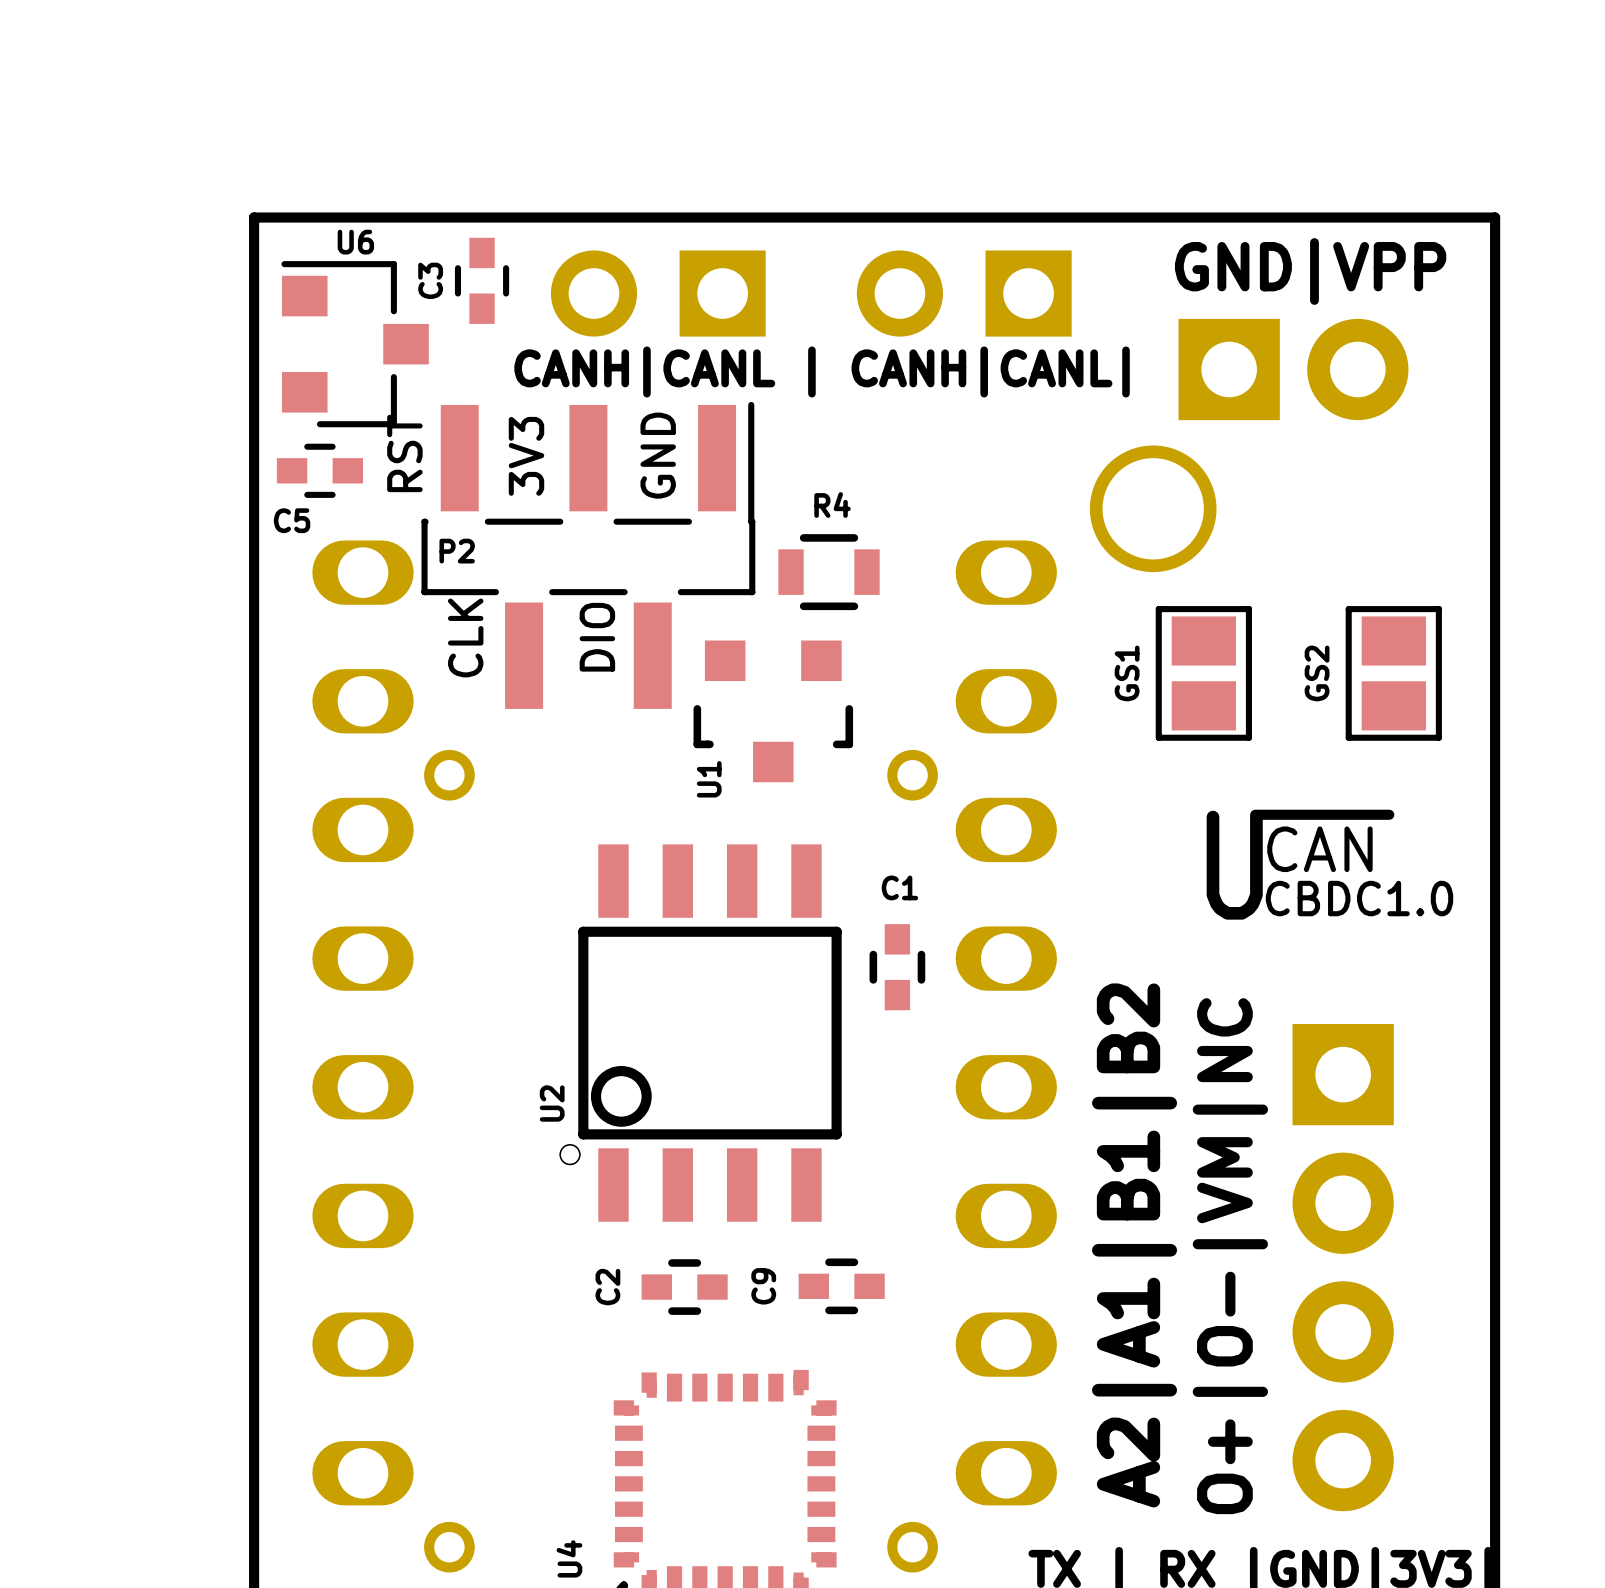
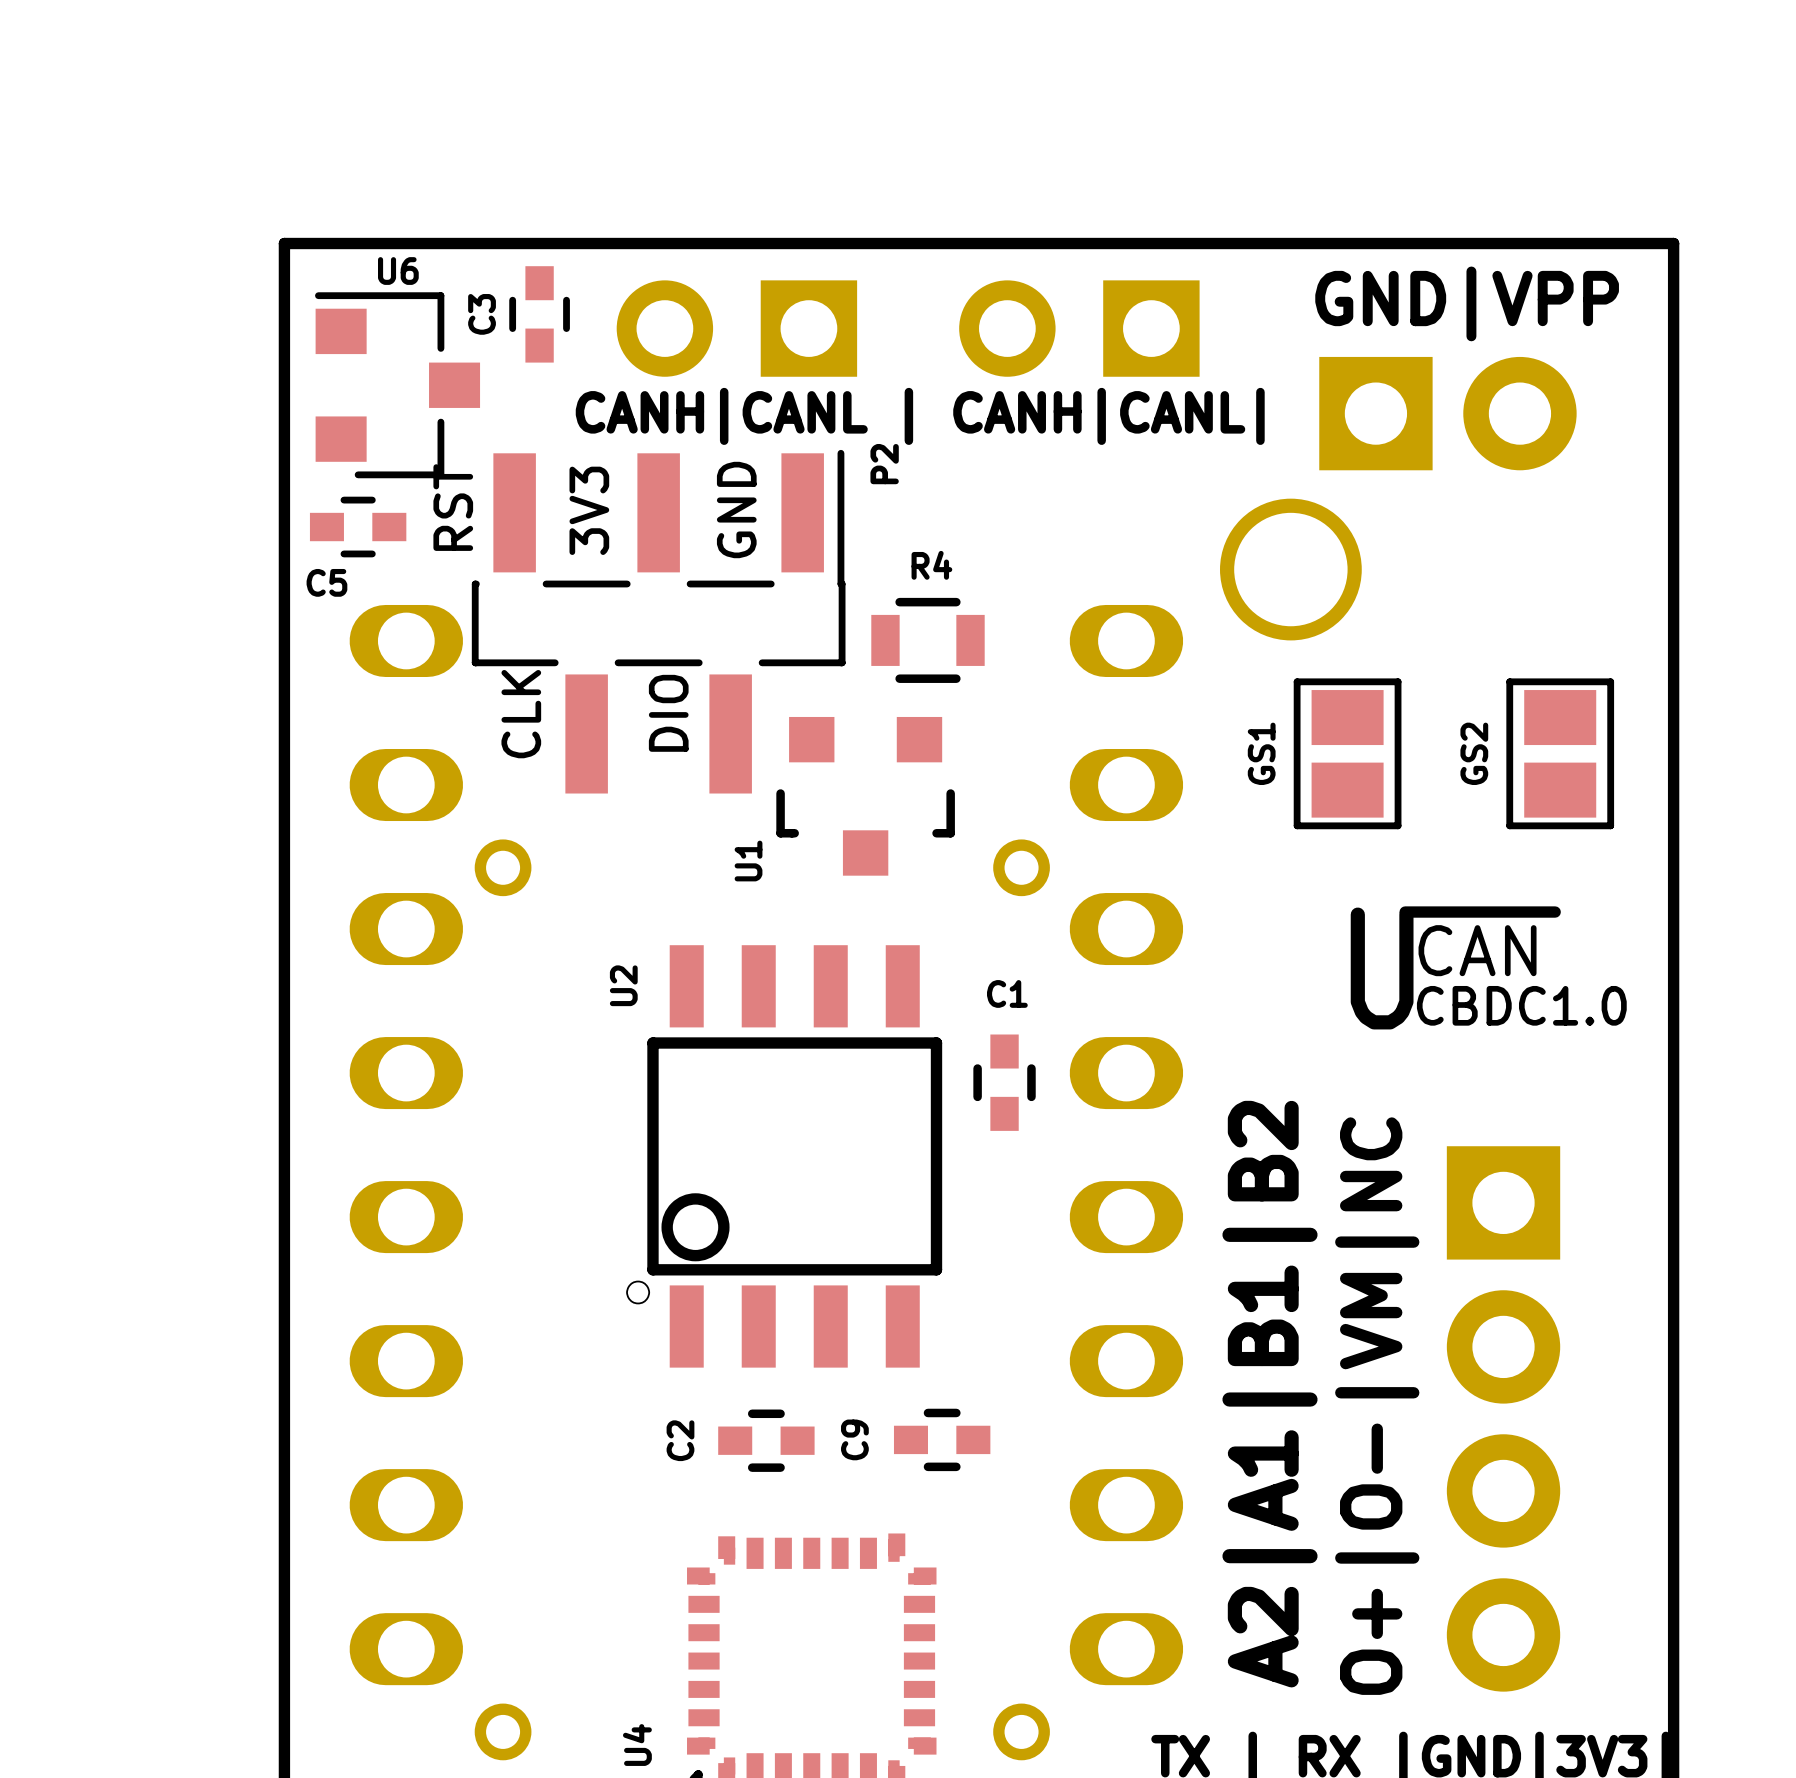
P2 name rotation: 0° (457, 551) -> 90° counterclockwise (884, 464)
P2 name position: P2 (457, 551) -> P2 (884, 464)
U1 name position: U1 (709, 779) -> U1 (748, 861)
U2 name position: U2 (552, 1103) -> U2 (623, 985)

